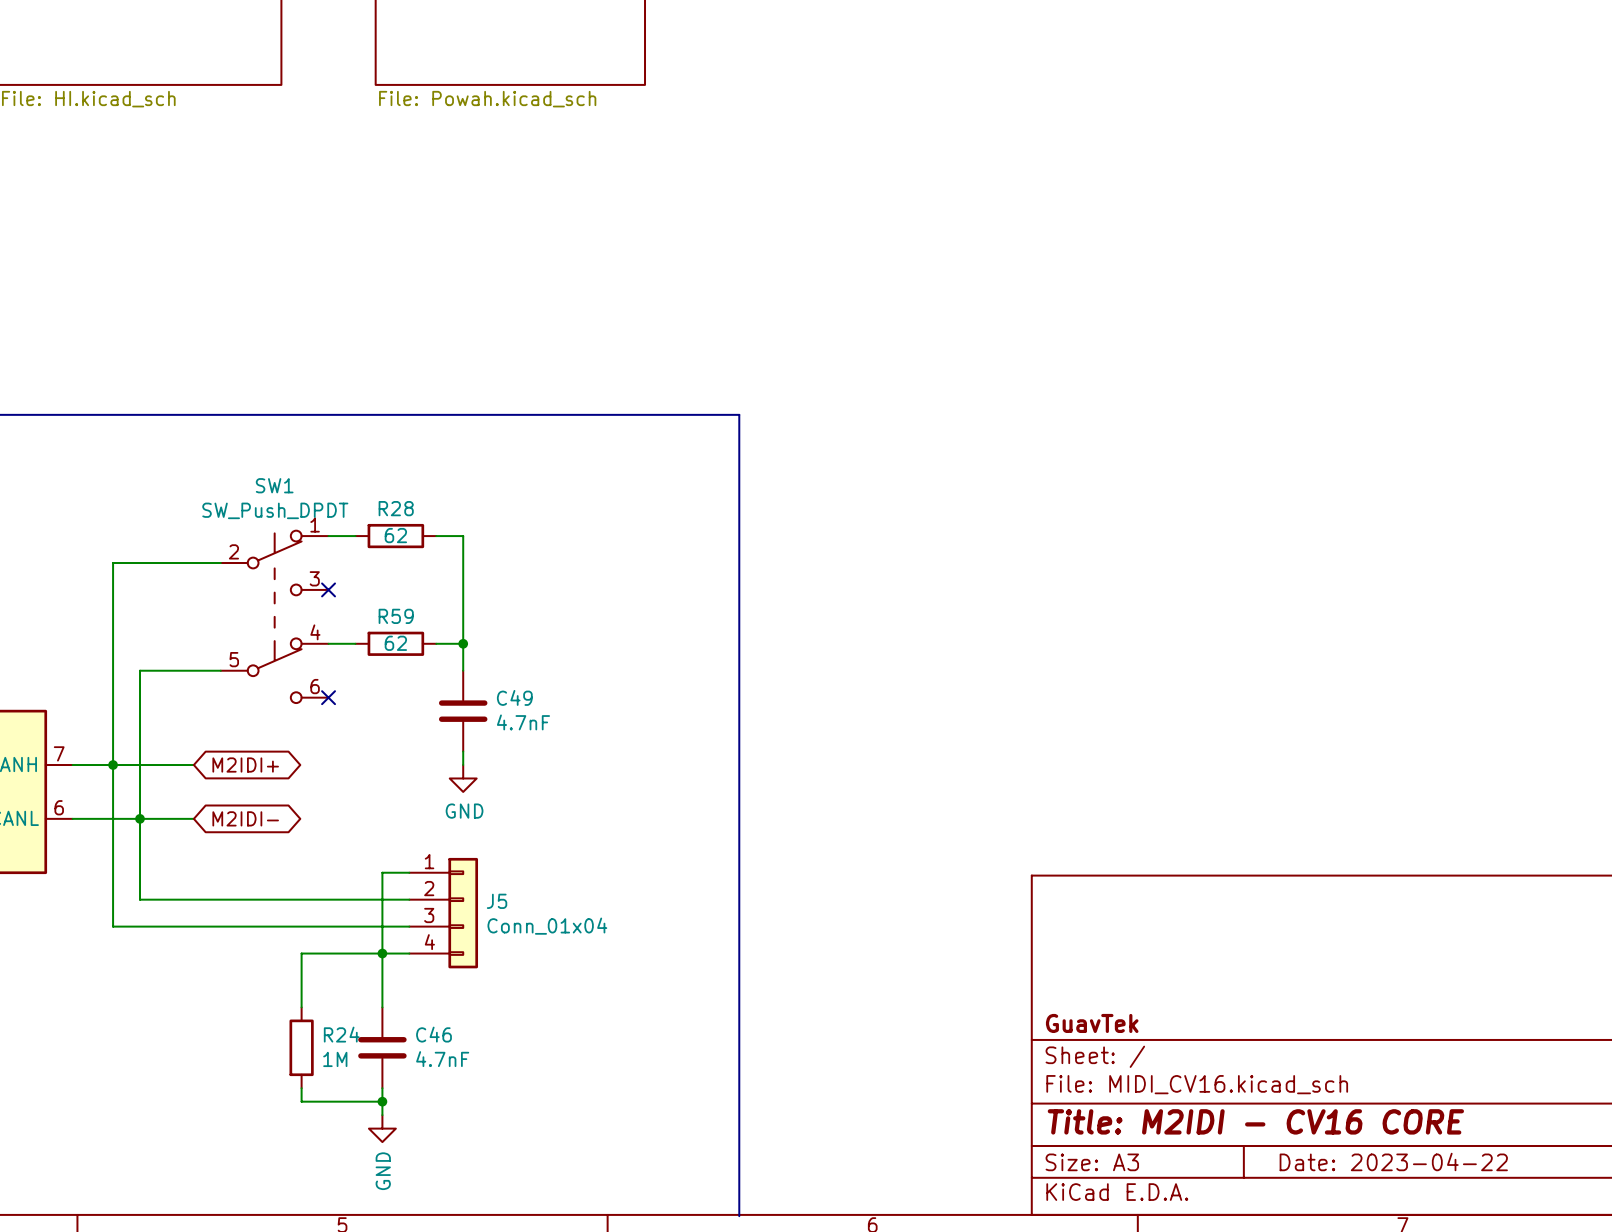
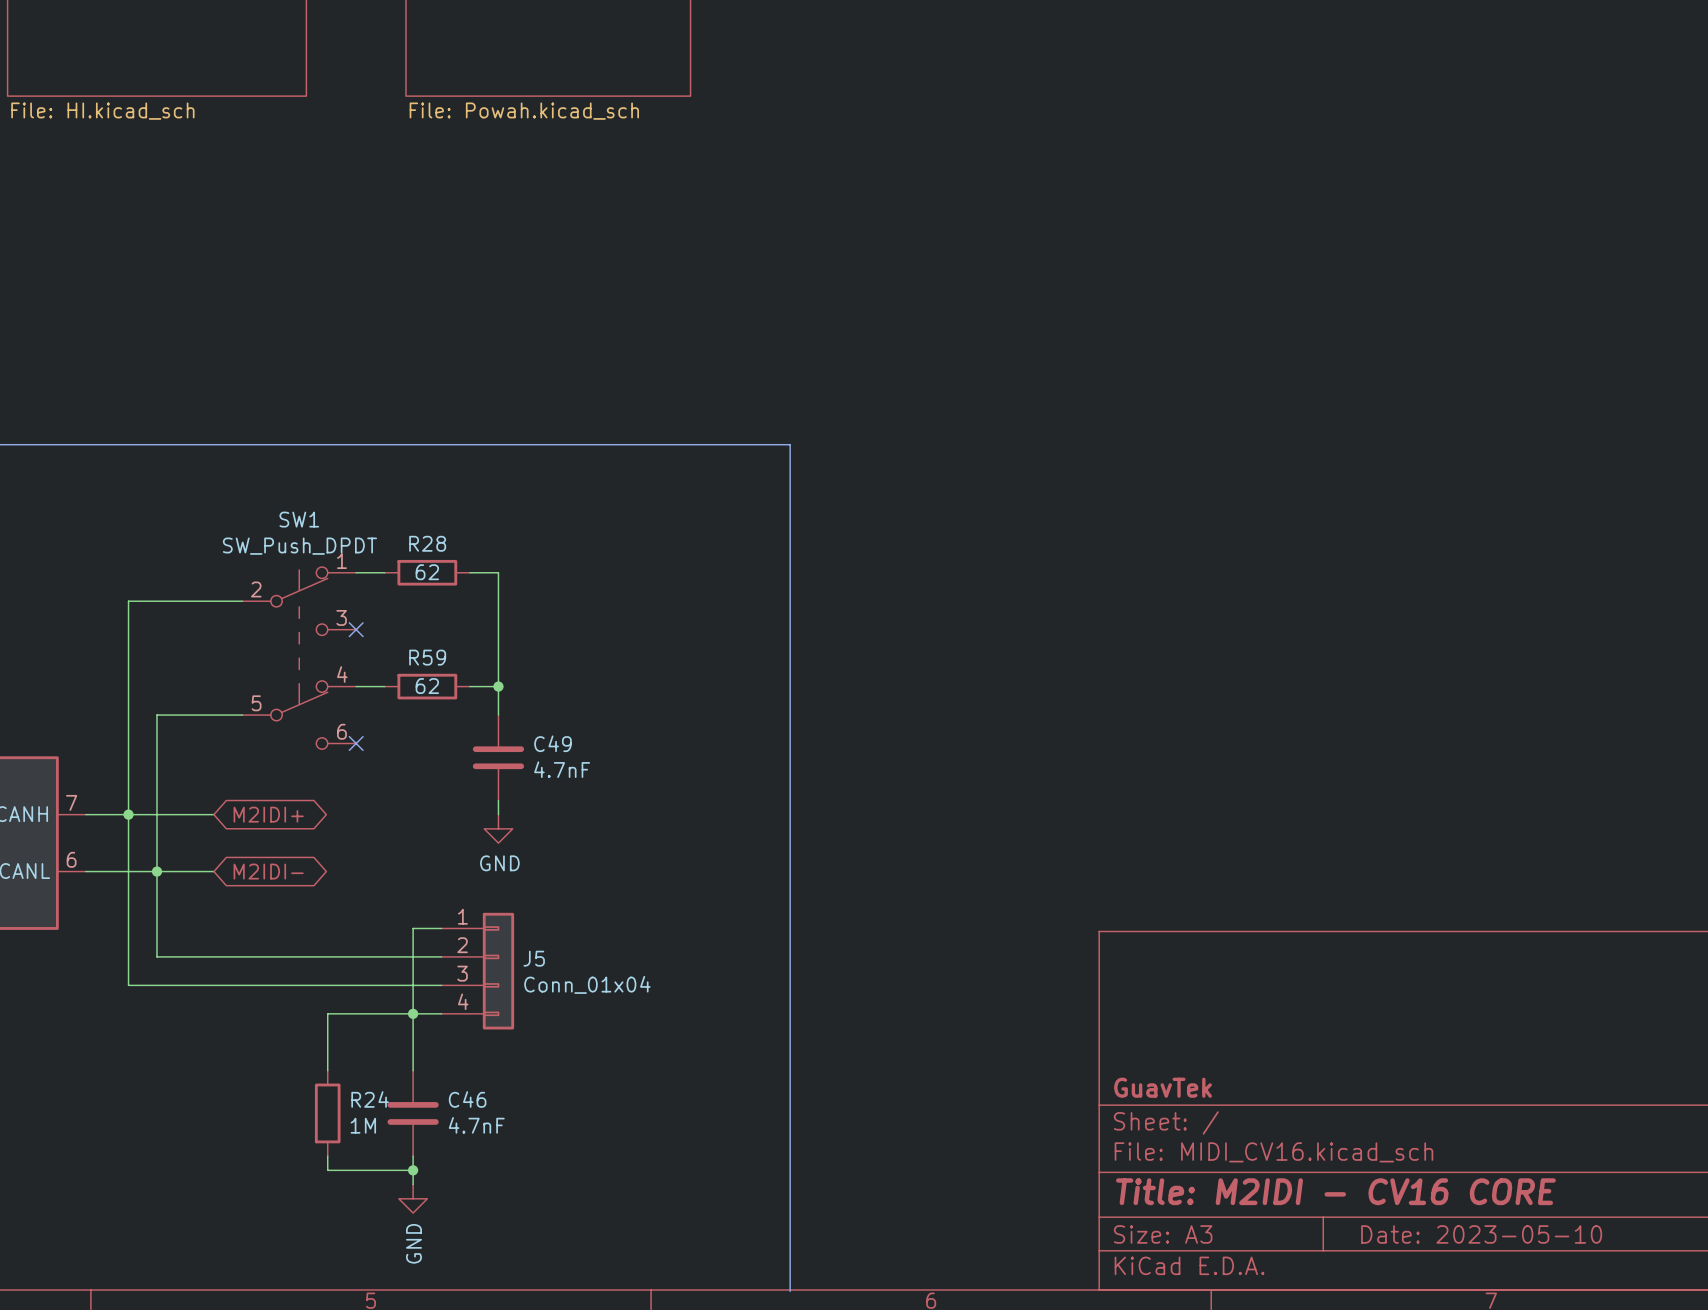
title block: Date: 2023-04-22 (1393, 1161) -> Date: 2023-05-10 (1481, 1234)

